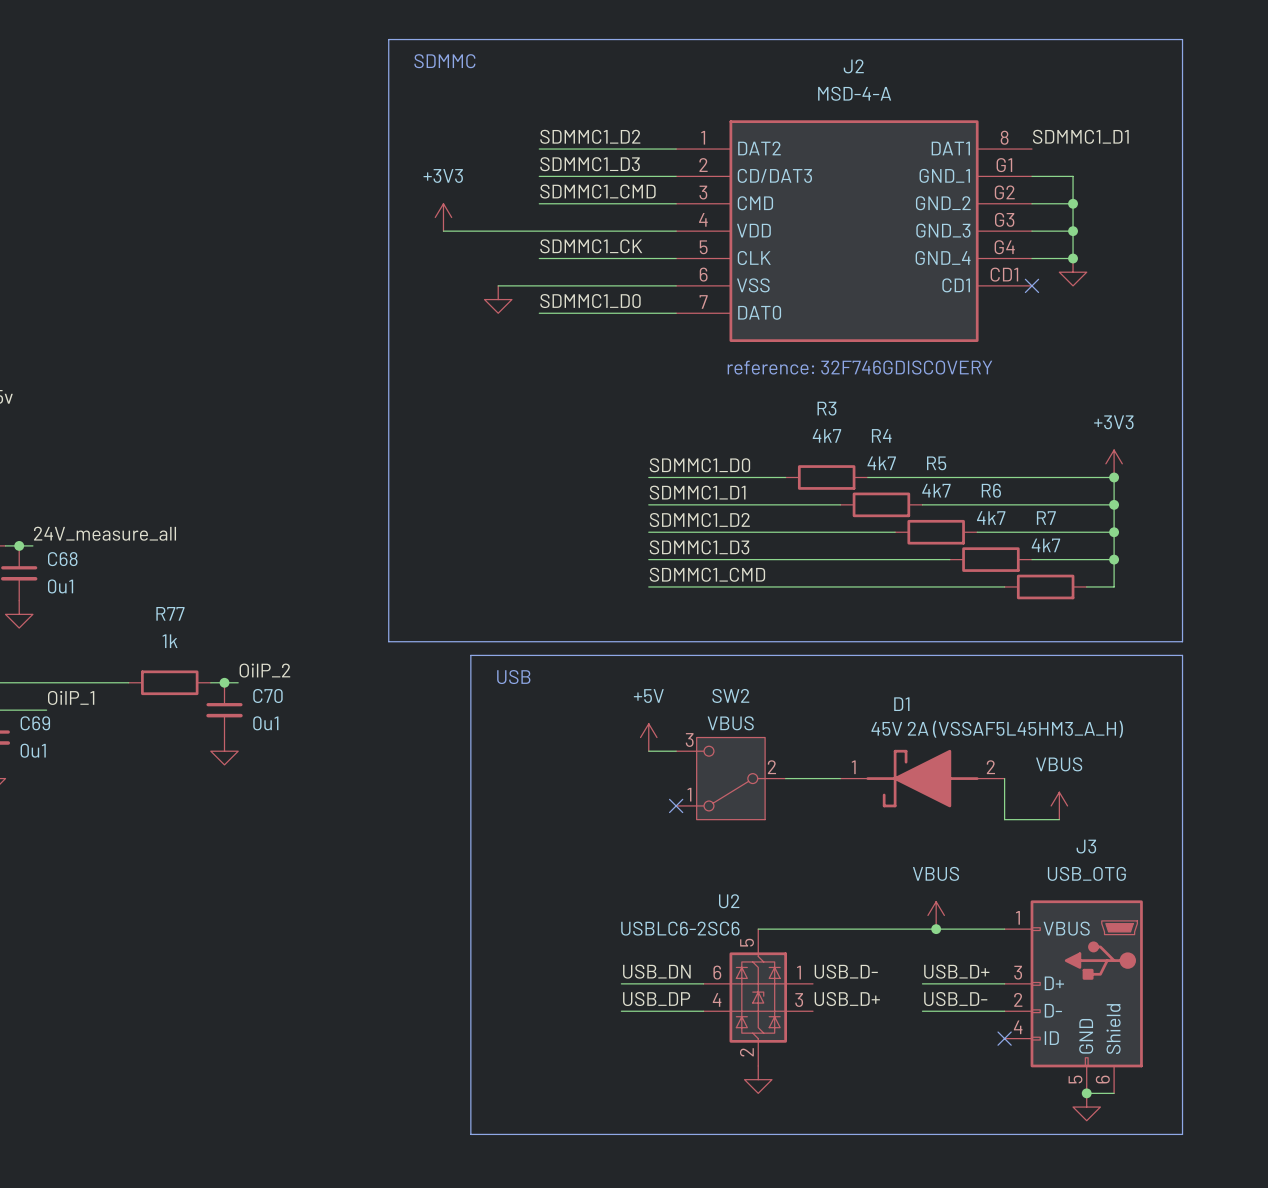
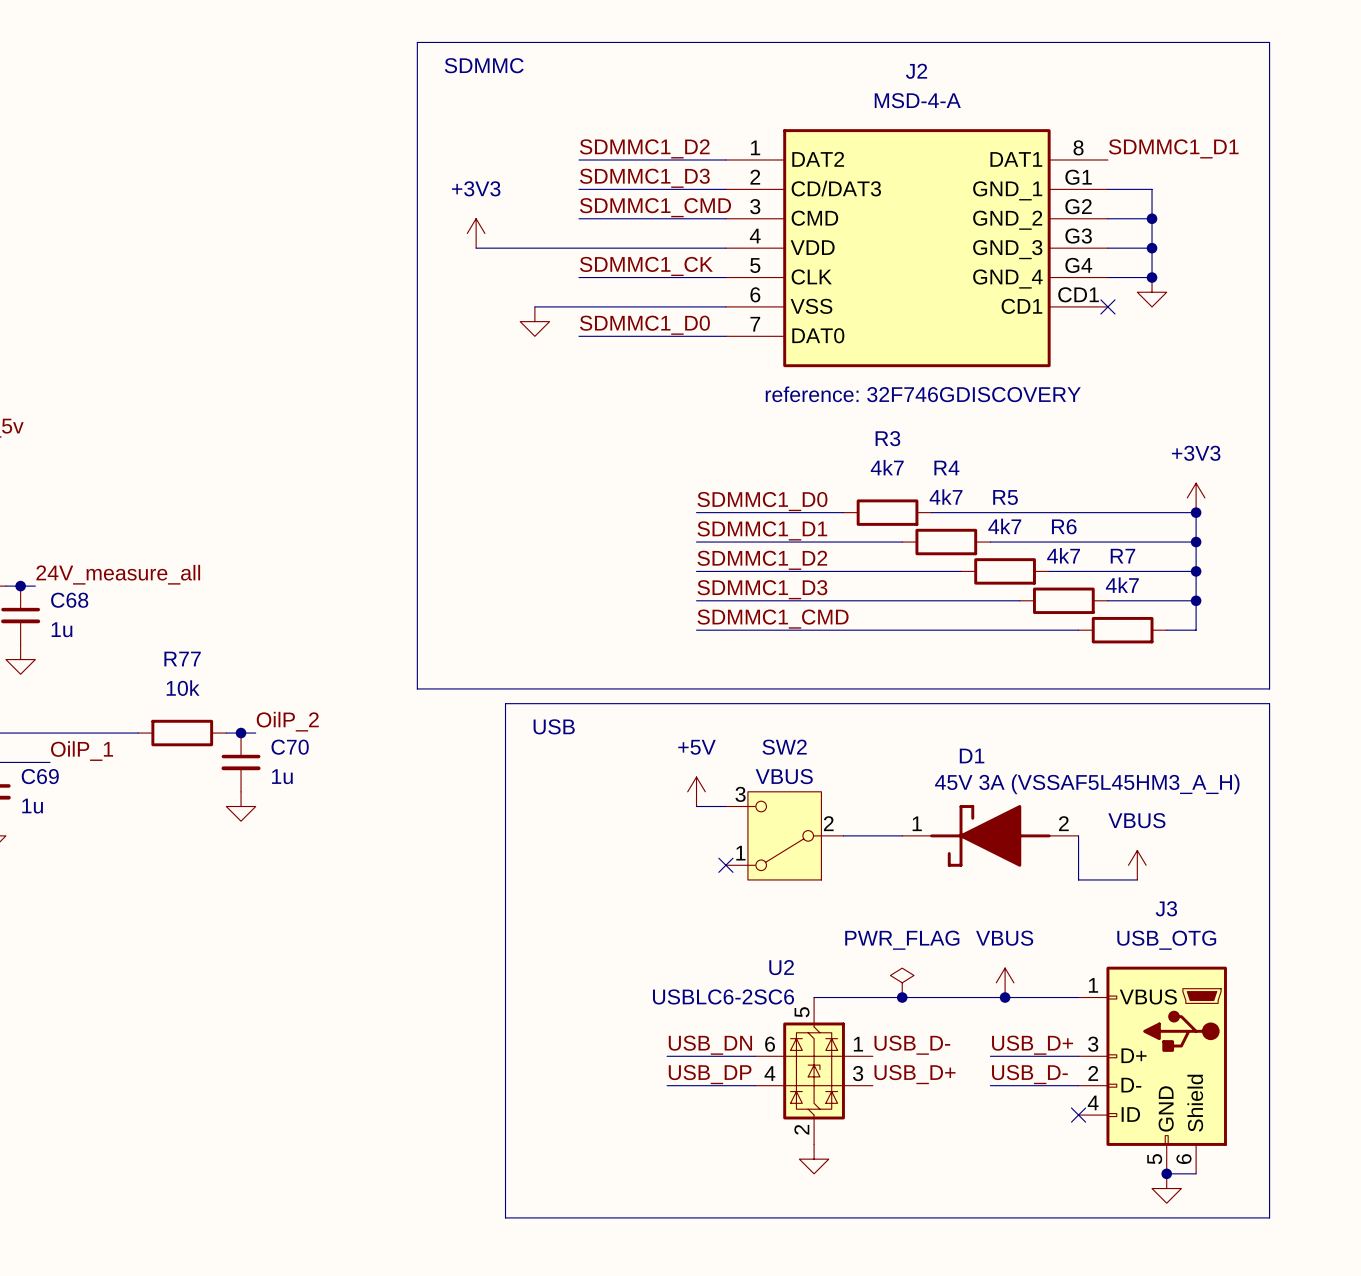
C68 value: 0u1 (60, 586) -> 1u (61, 629)
R77 value: 1k (170, 641) -> 10k (183, 688)
C70 value: 0u1 (265, 723) -> 1u (282, 776)
D1 value: 45V 2A (VSSAF5L45HM3_A_H) (997, 729) -> 45V 3A (VSSAF5L45HM3_A_H) (1087, 784)
C69 value: 0u1 (33, 750) -> 1u (32, 806)
power symbol: none -> PWR_FLAG (902, 982)
junction: none -> (902, 997)

